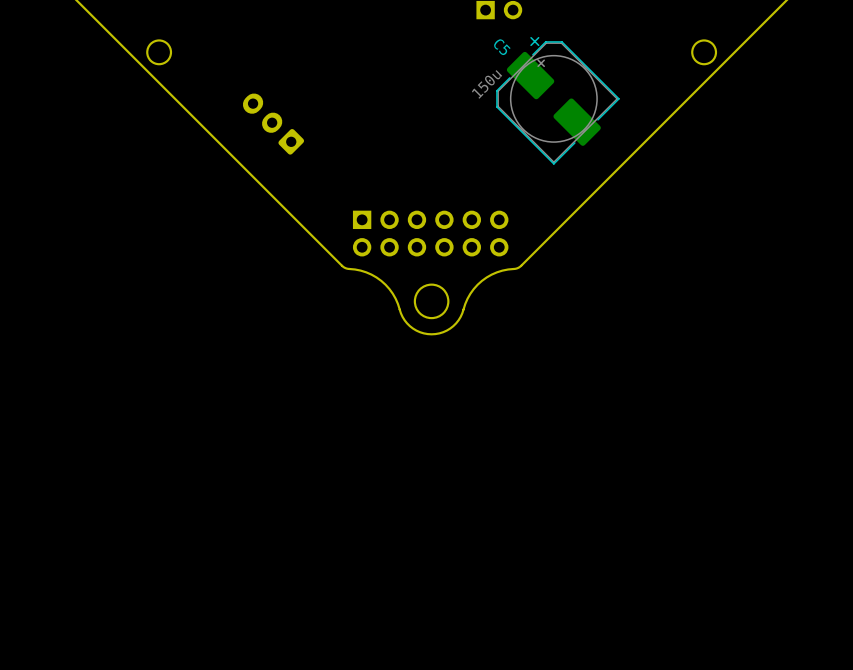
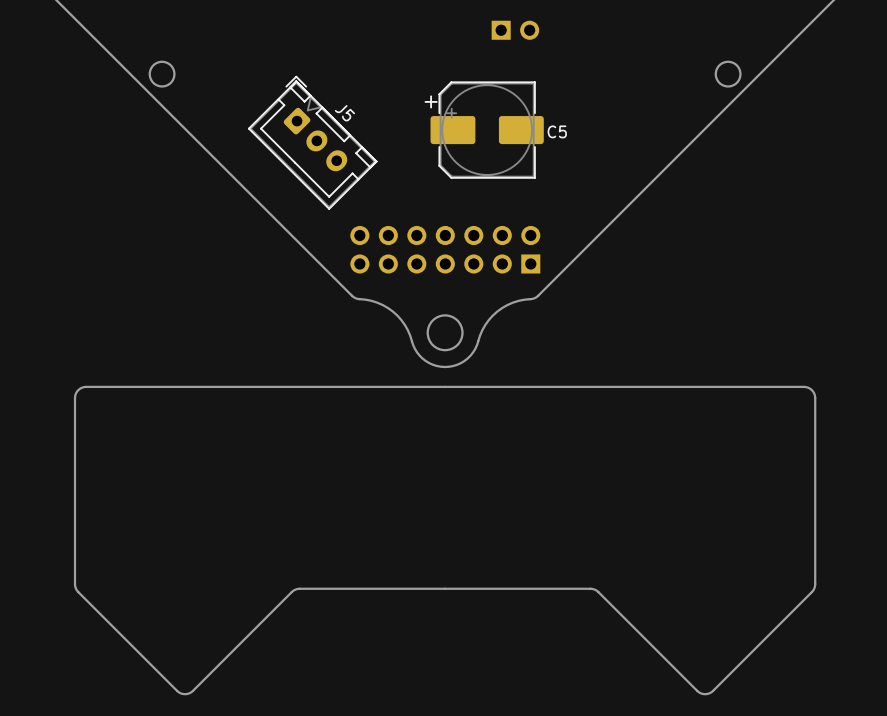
C5 name position: C5 (502, 47) -> C5 (557, 131)
C5 value: 150u (487, 84) -> none
C5 rotation: 0° (557, 100) -> 45° counterclockwise (484, 130)
C5 position: (557, 100) -> (484, 130)
J5 side: top (273, 124) -> bottom (312, 142)
part: none -> (445, 249)
part: (430, 233) -> none
board edge: none -> (803, 386) (83, 387) (77, 391) (75, 398) (75, 587) (177, 690) (183, 694) (192, 690) (291, 592) (299, 588) (593, 589) (697, 690) (707, 693) (713, 690) (814, 587) (815, 398) (811, 390) (803, 386)

